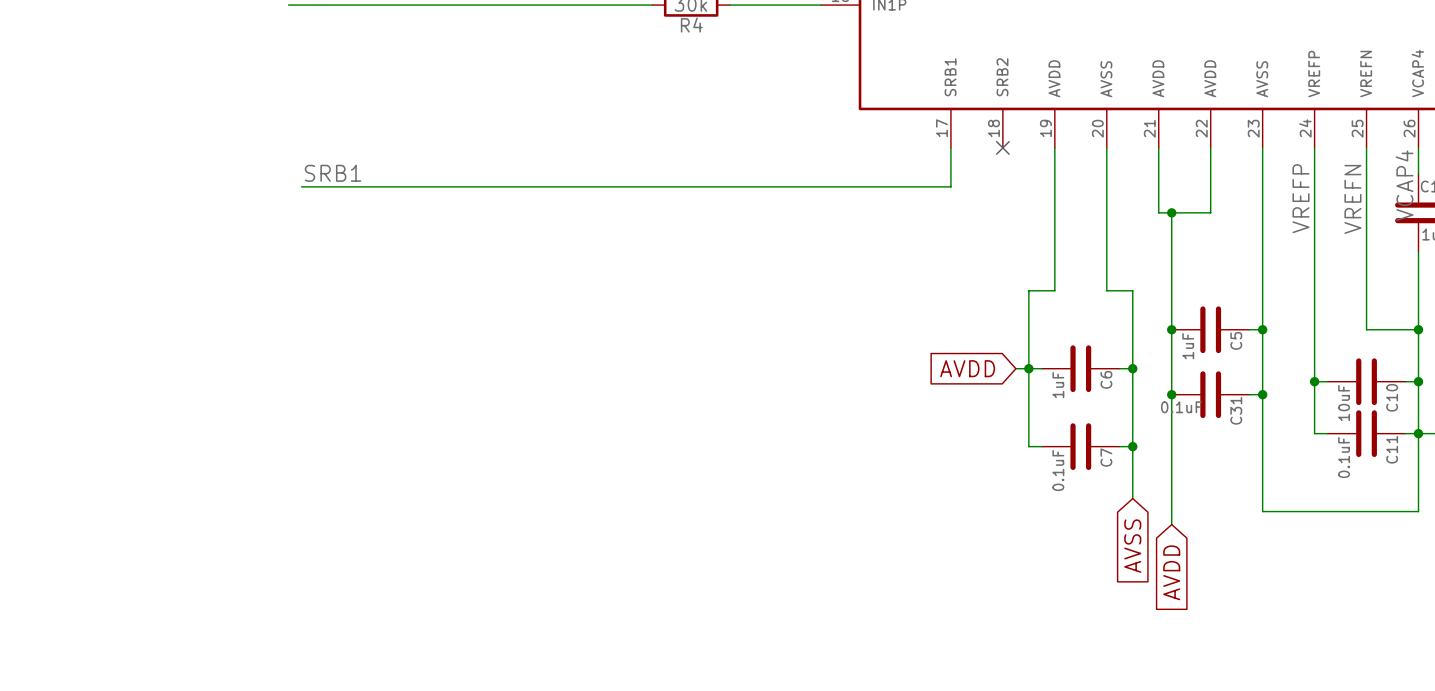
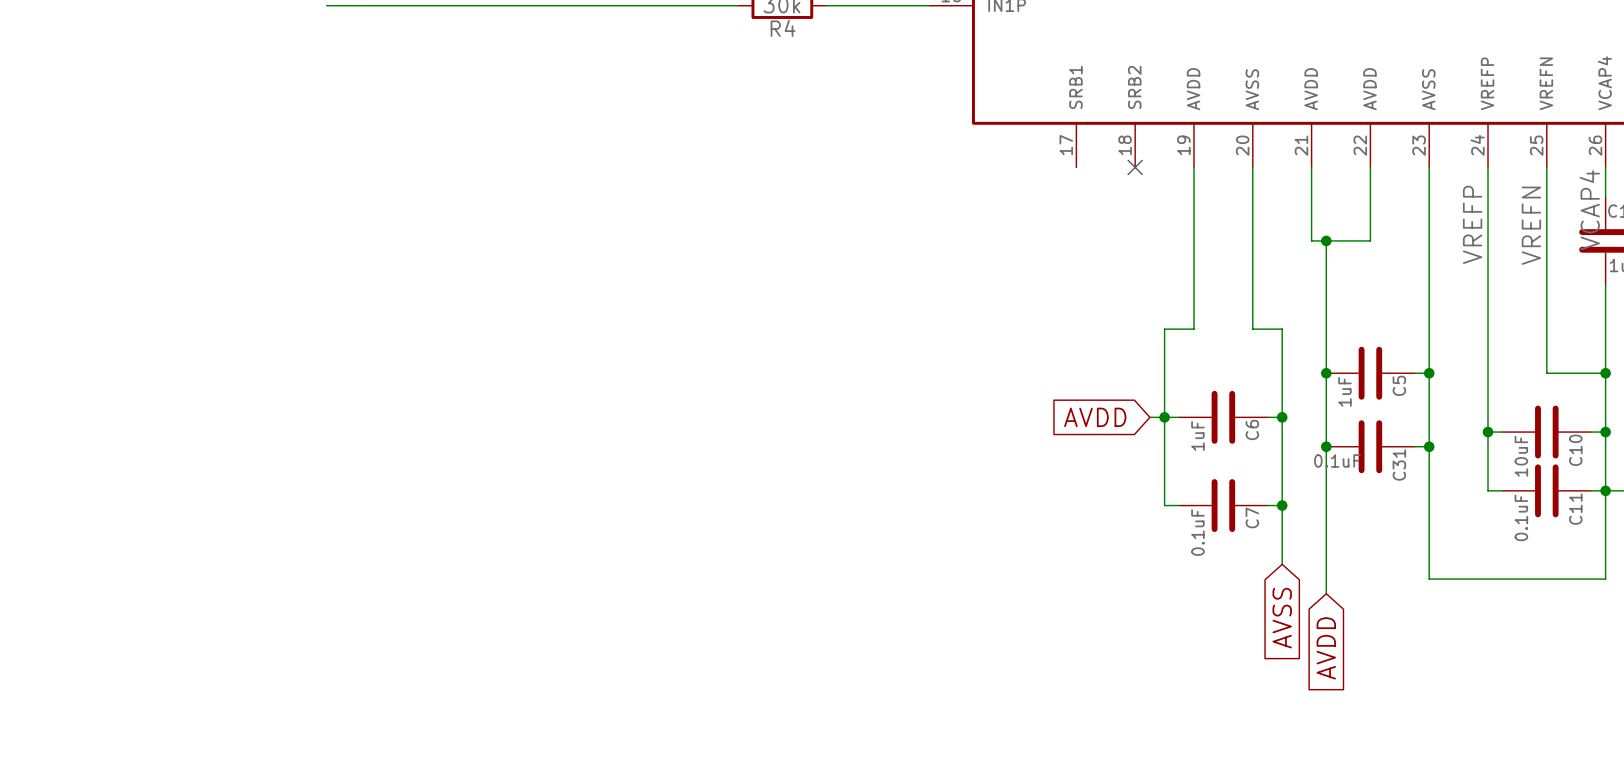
wire: (950, 147) (950, 186) (301, 186) -> none
label: SRB1 (333, 173) -> none

